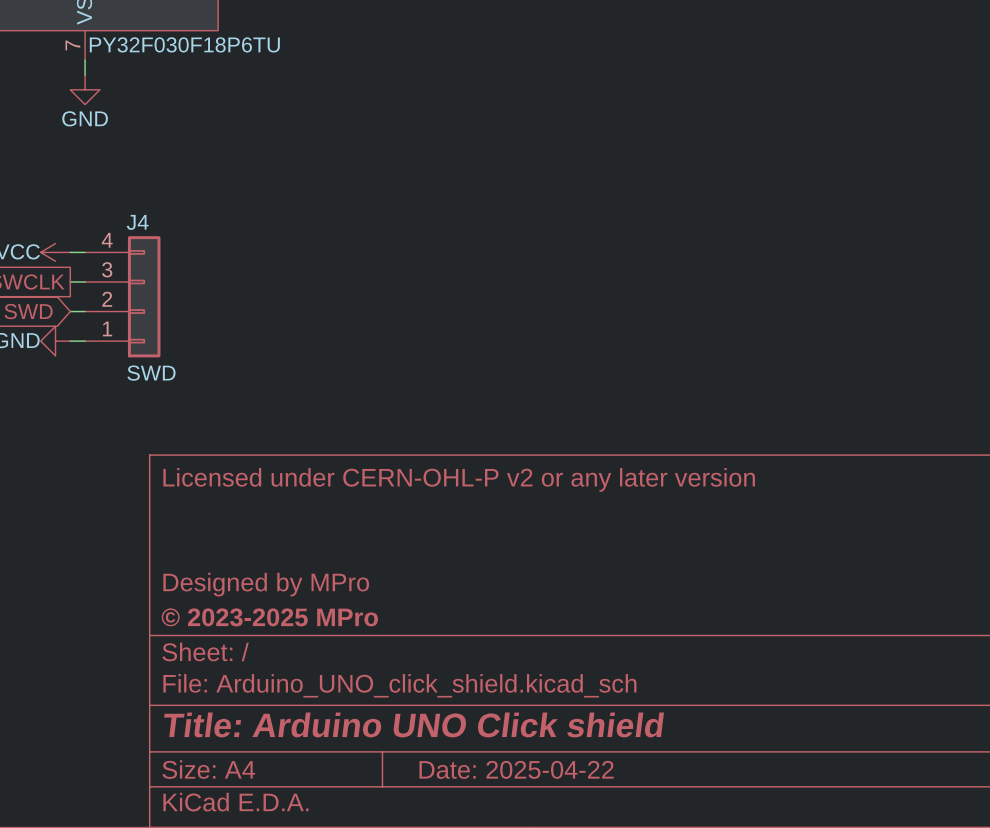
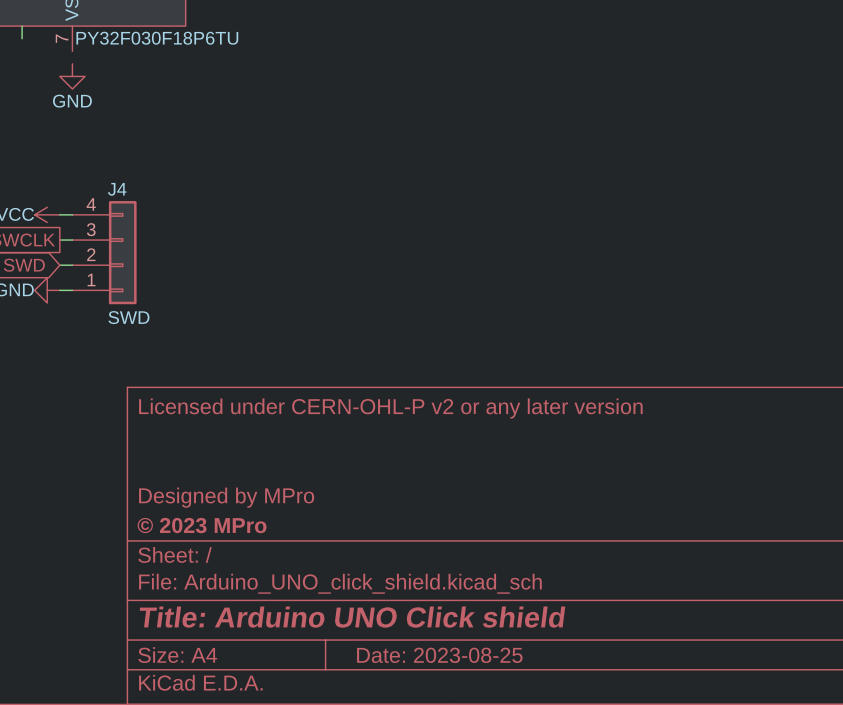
wire: (85, 60) (85, 75) -> (22, 26) (22, 38)
title block: © 2023-2025 MPro (269, 617) -> © 2023 MPro (202, 525)
title block: Date: 2025-04-22 (516, 769) -> Date: 2023-08-25 (439, 655)

